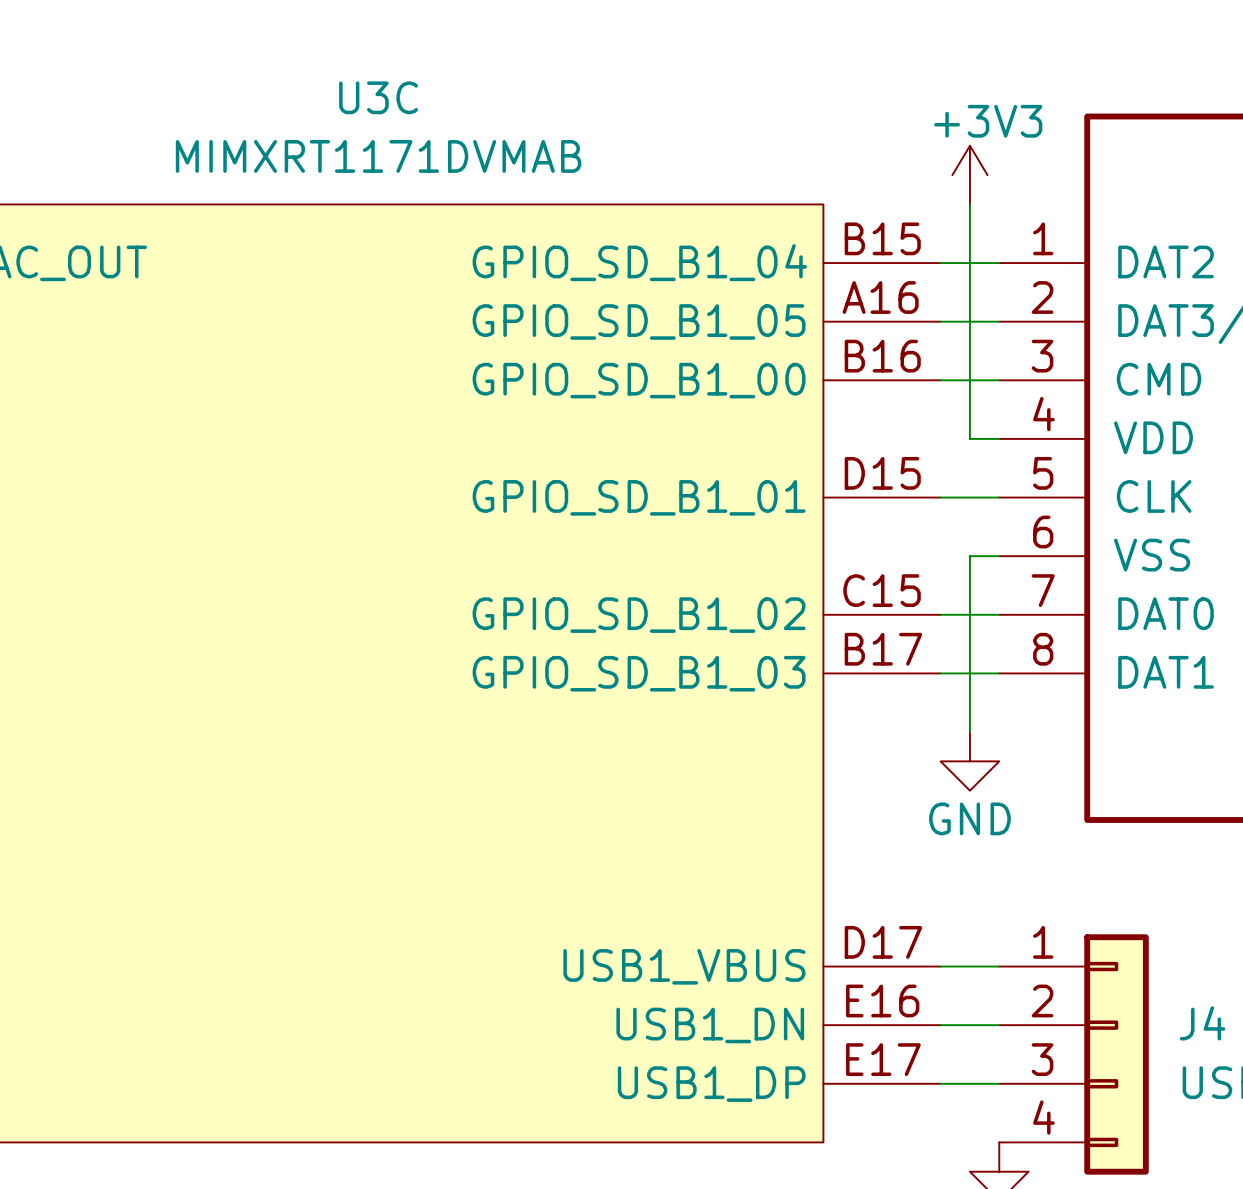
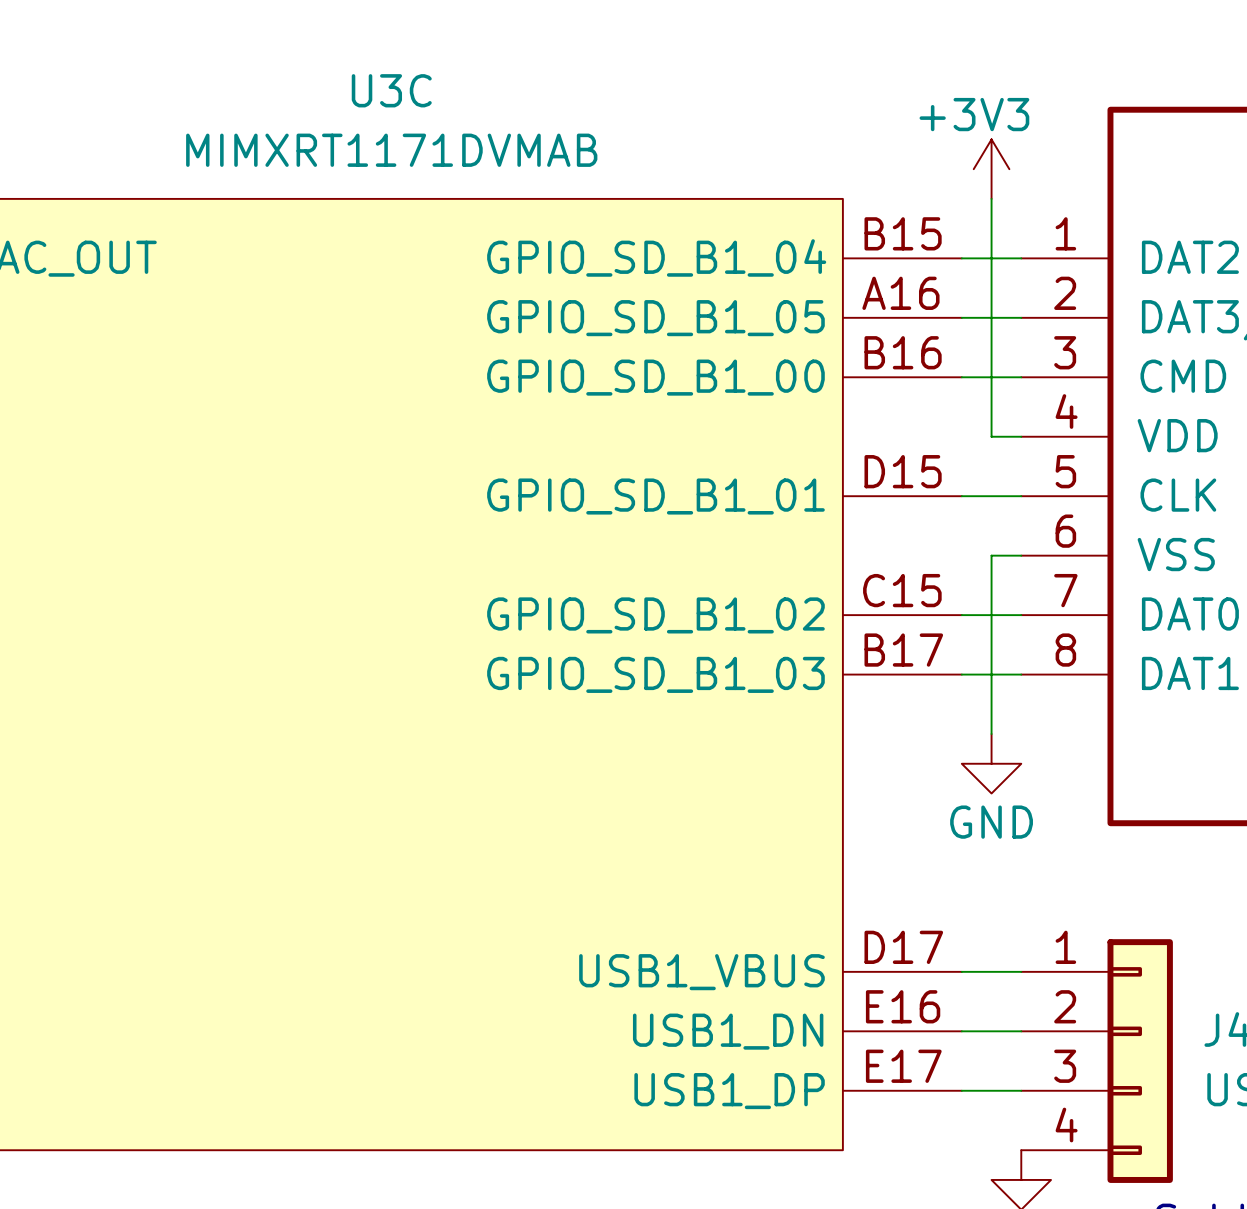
power symbol text position: +3V3 (988, 121) -> +3V3 (974, 114)

